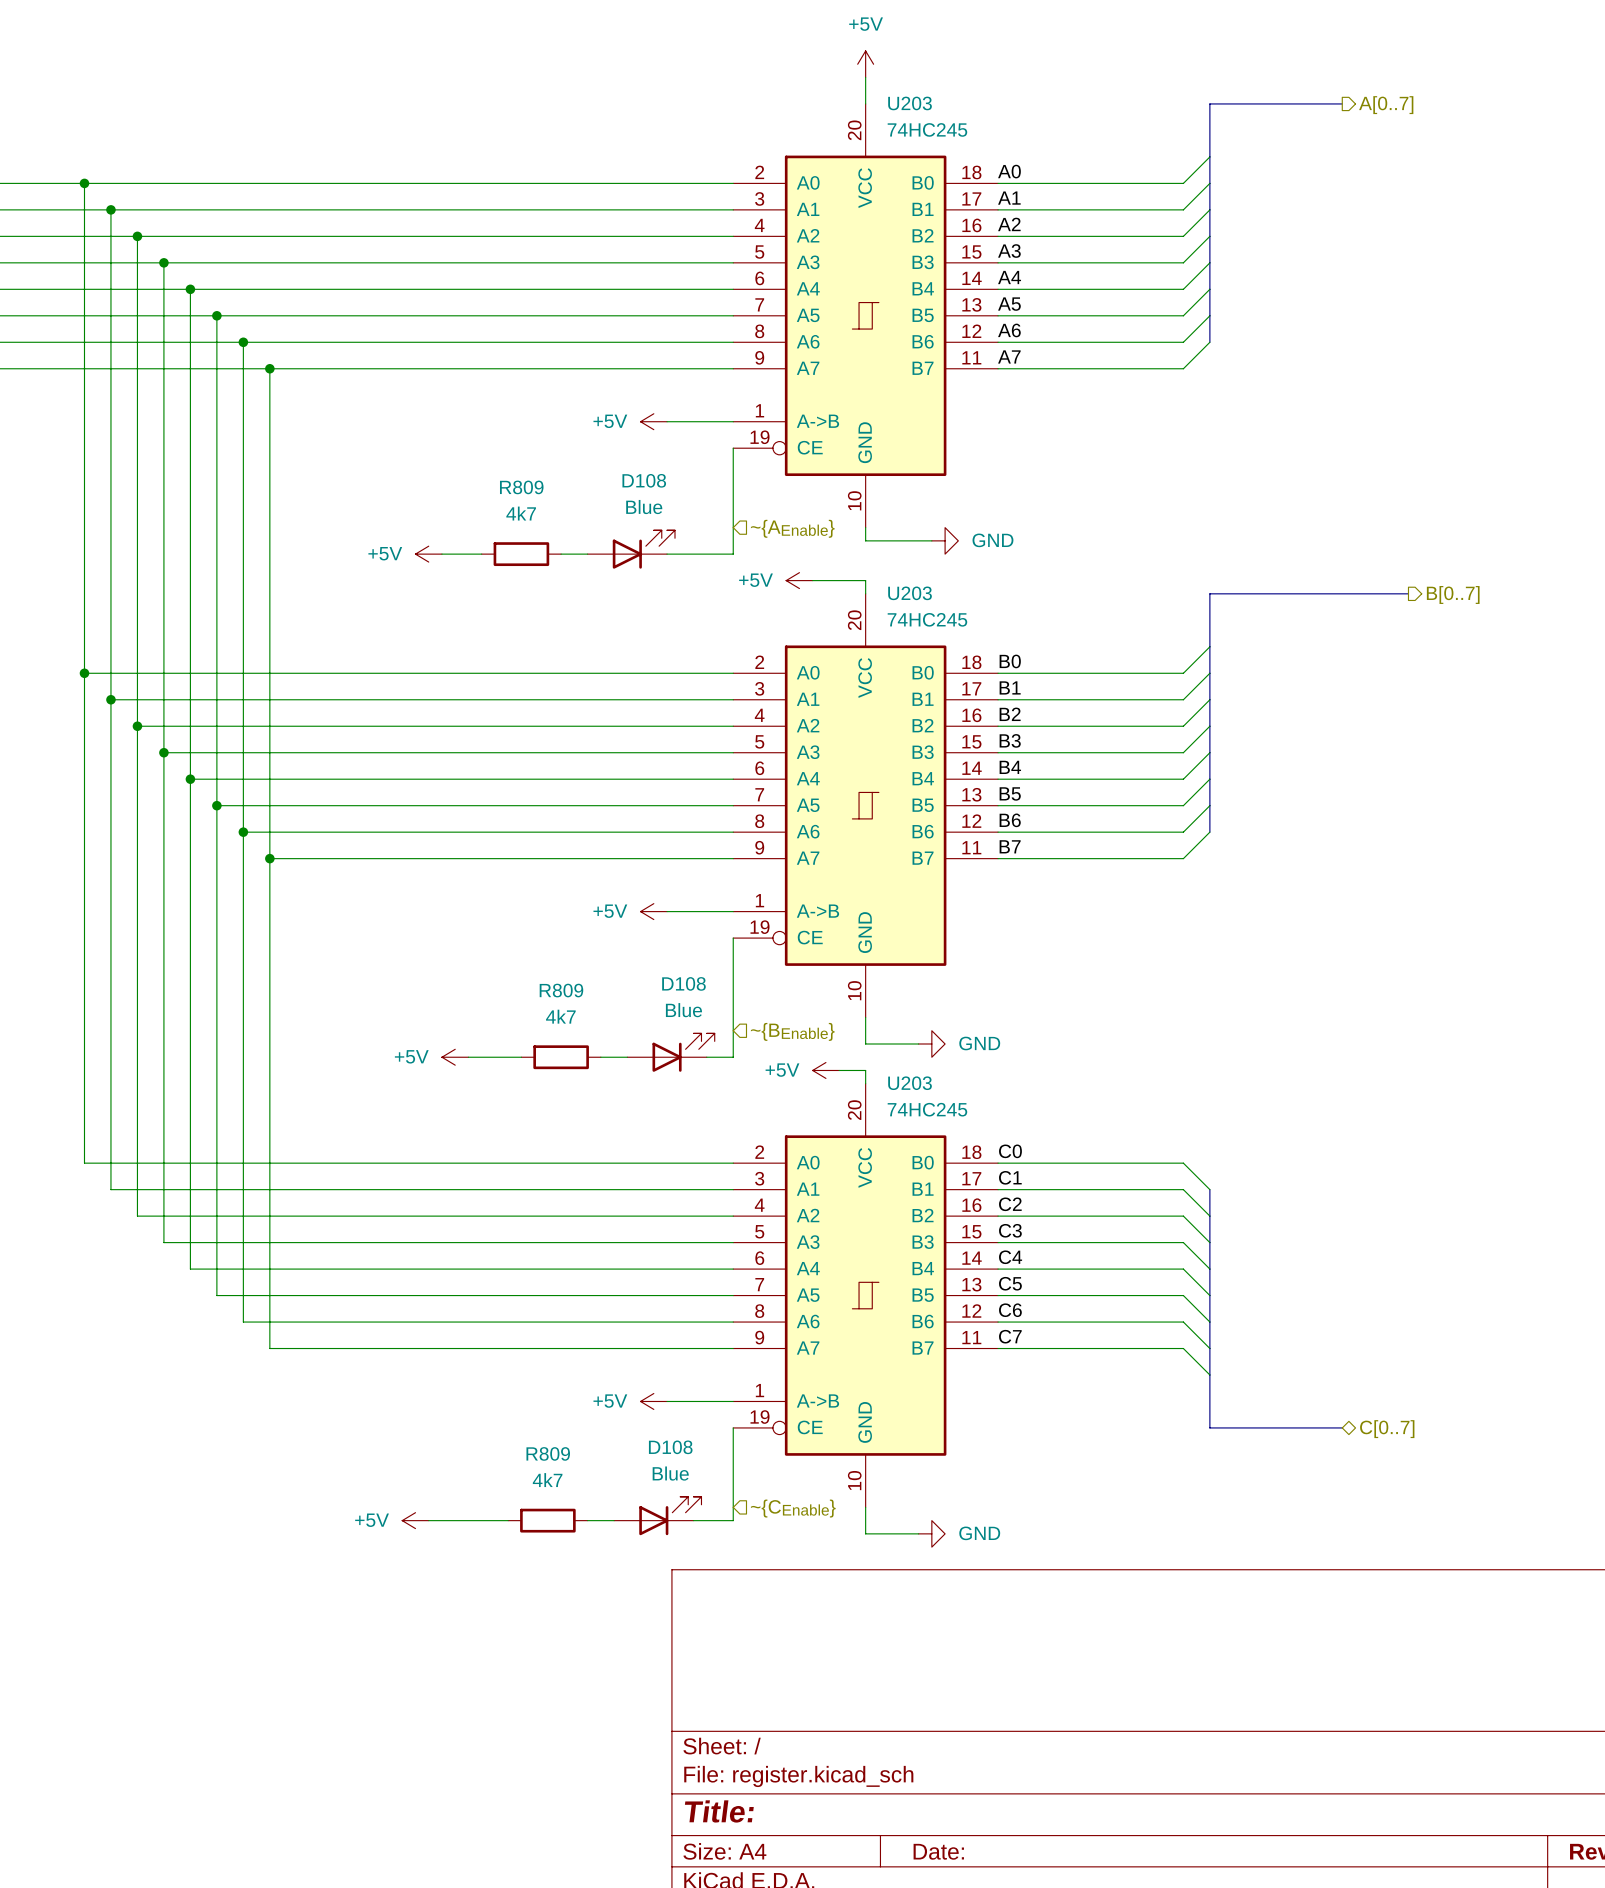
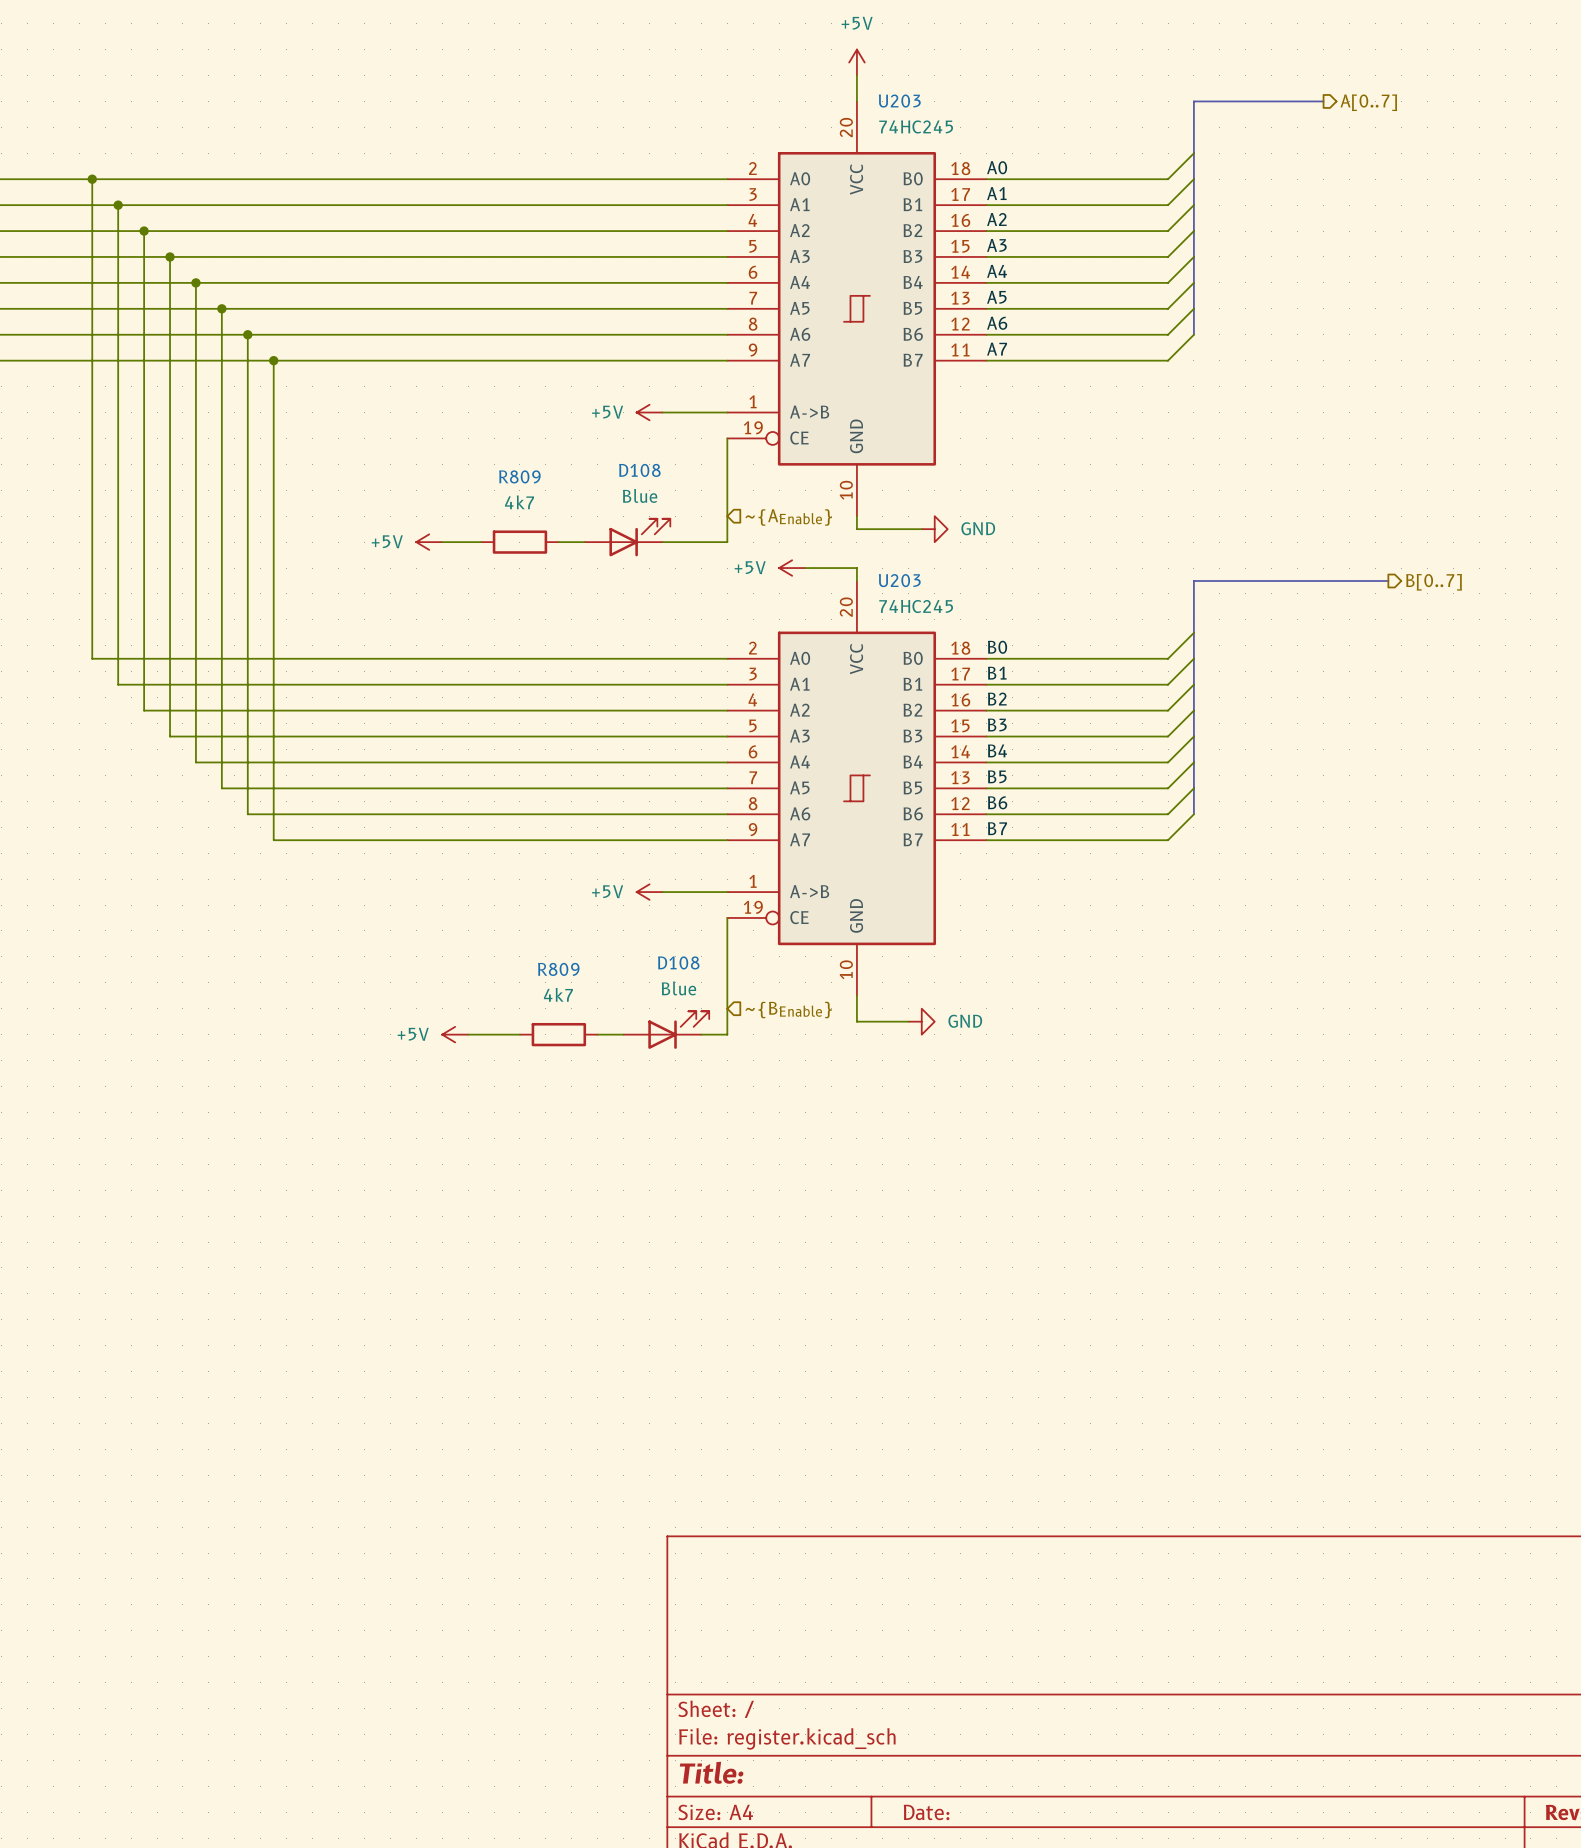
wire: (84, 673) (84, 1163) (733, 1163) -> none
junction: (84, 673) -> none
wire: (110, 699) (110, 1189) (733, 1189) -> none
junction: (110, 699) -> none
wire: (137, 726) (137, 1216) (733, 1216) -> none
junction: (137, 726) -> none
wire: (163, 752) (163, 1242) (733, 1242) -> none
junction: (163, 752) -> none
wire: (190, 779) (190, 1269) (733, 1269) -> none
junction: (190, 779) -> none
wire: (216, 805) (216, 1295) (733, 1295) -> none
junction: (216, 805) -> none
wire: (243, 832) (243, 1322) (733, 1322) -> none
junction: (243, 832) -> none
wire: (269, 858) (269, 1348) (733, 1348) -> none
junction: (269, 858) -> none
power symbol: +5V (825, 1070) -> none
wire: (839, 1070) (865, 1070) (865, 1083) -> none
label: C0 (1010, 1151) -> none
wire: (998, 1163) (1183, 1163) (1209, 1189) -> none
label: C1 (1010, 1177) -> none
wire: (998, 1189) (1183, 1189) (1209, 1216) -> none
bus: (1209, 1189) (1209, 1427) (1342, 1427) -> none
label: C2 (1010, 1204) -> none
wire: (998, 1216) (1183, 1216) (1209, 1242) -> none
label: C3 (1010, 1230) -> none
wire: (998, 1242) (1183, 1242) (1209, 1269) -> none
label: C4 (1010, 1257) -> none
wire: (998, 1269) (1183, 1269) (1209, 1295) -> none
label: C5 (1010, 1283) -> none
U203: 74HC245 (865, 1295) -> none
wire: (998, 1295) (1183, 1295) (1209, 1322) -> none
label: C6 (1010, 1310) -> none
wire: (998, 1322) (1183, 1322) (1209, 1348) -> none
label: C7 (1010, 1336) -> none
wire: (998, 1348) (1183, 1348) (1209, 1374) -> none
power symbol: +5V (653, 1401) -> none
wire: (667, 1401) (733, 1401) -> none
wire: (733, 1427) (733, 1520) (693, 1520) -> none
hierarchical label: C[0..7] (1387, 1429) -> none
wire: (865, 1507) (865, 1533) (918, 1533) -> none
hierarchical label: ~{CEnable} (793, 1508) -> none
D108: Blue (657, 1516) -> none
power symbol: +5V (415, 1520) -> none
wire: (428, 1520) (508, 1520) -> none
R809: 4k7 (547, 1520) -> none
wire: (587, 1520) (614, 1520) -> none
power symbol: GND (931, 1533) -> none

